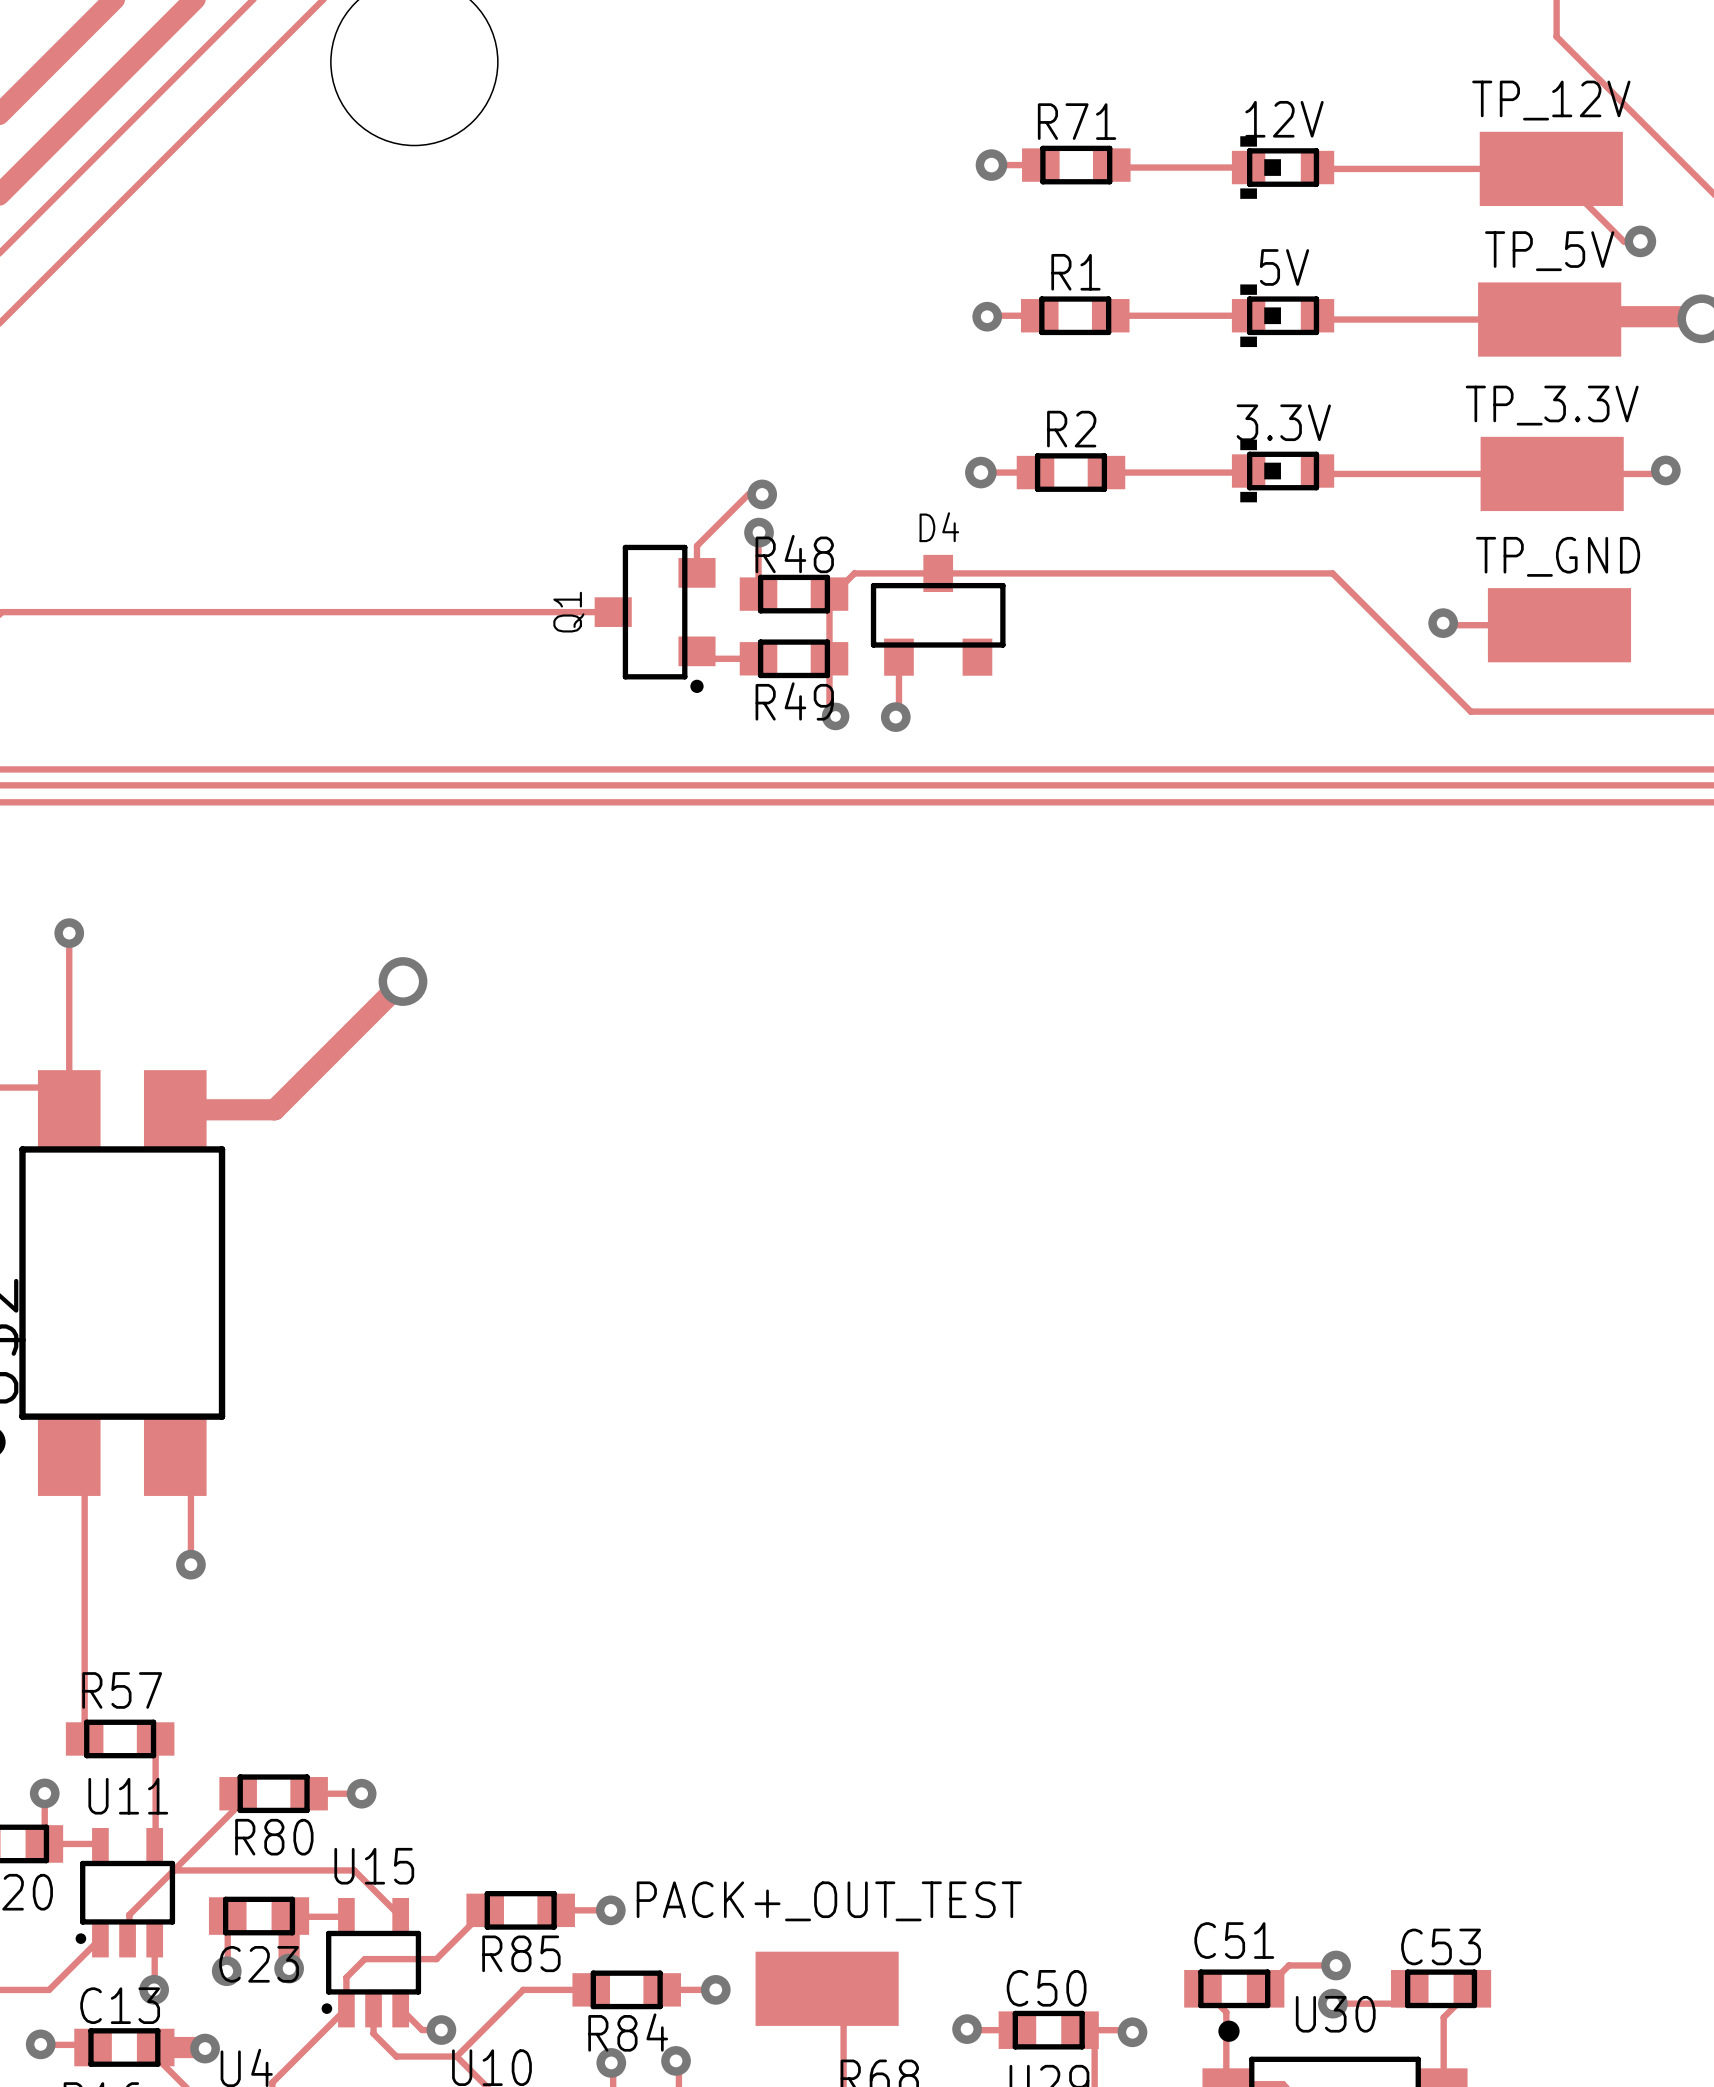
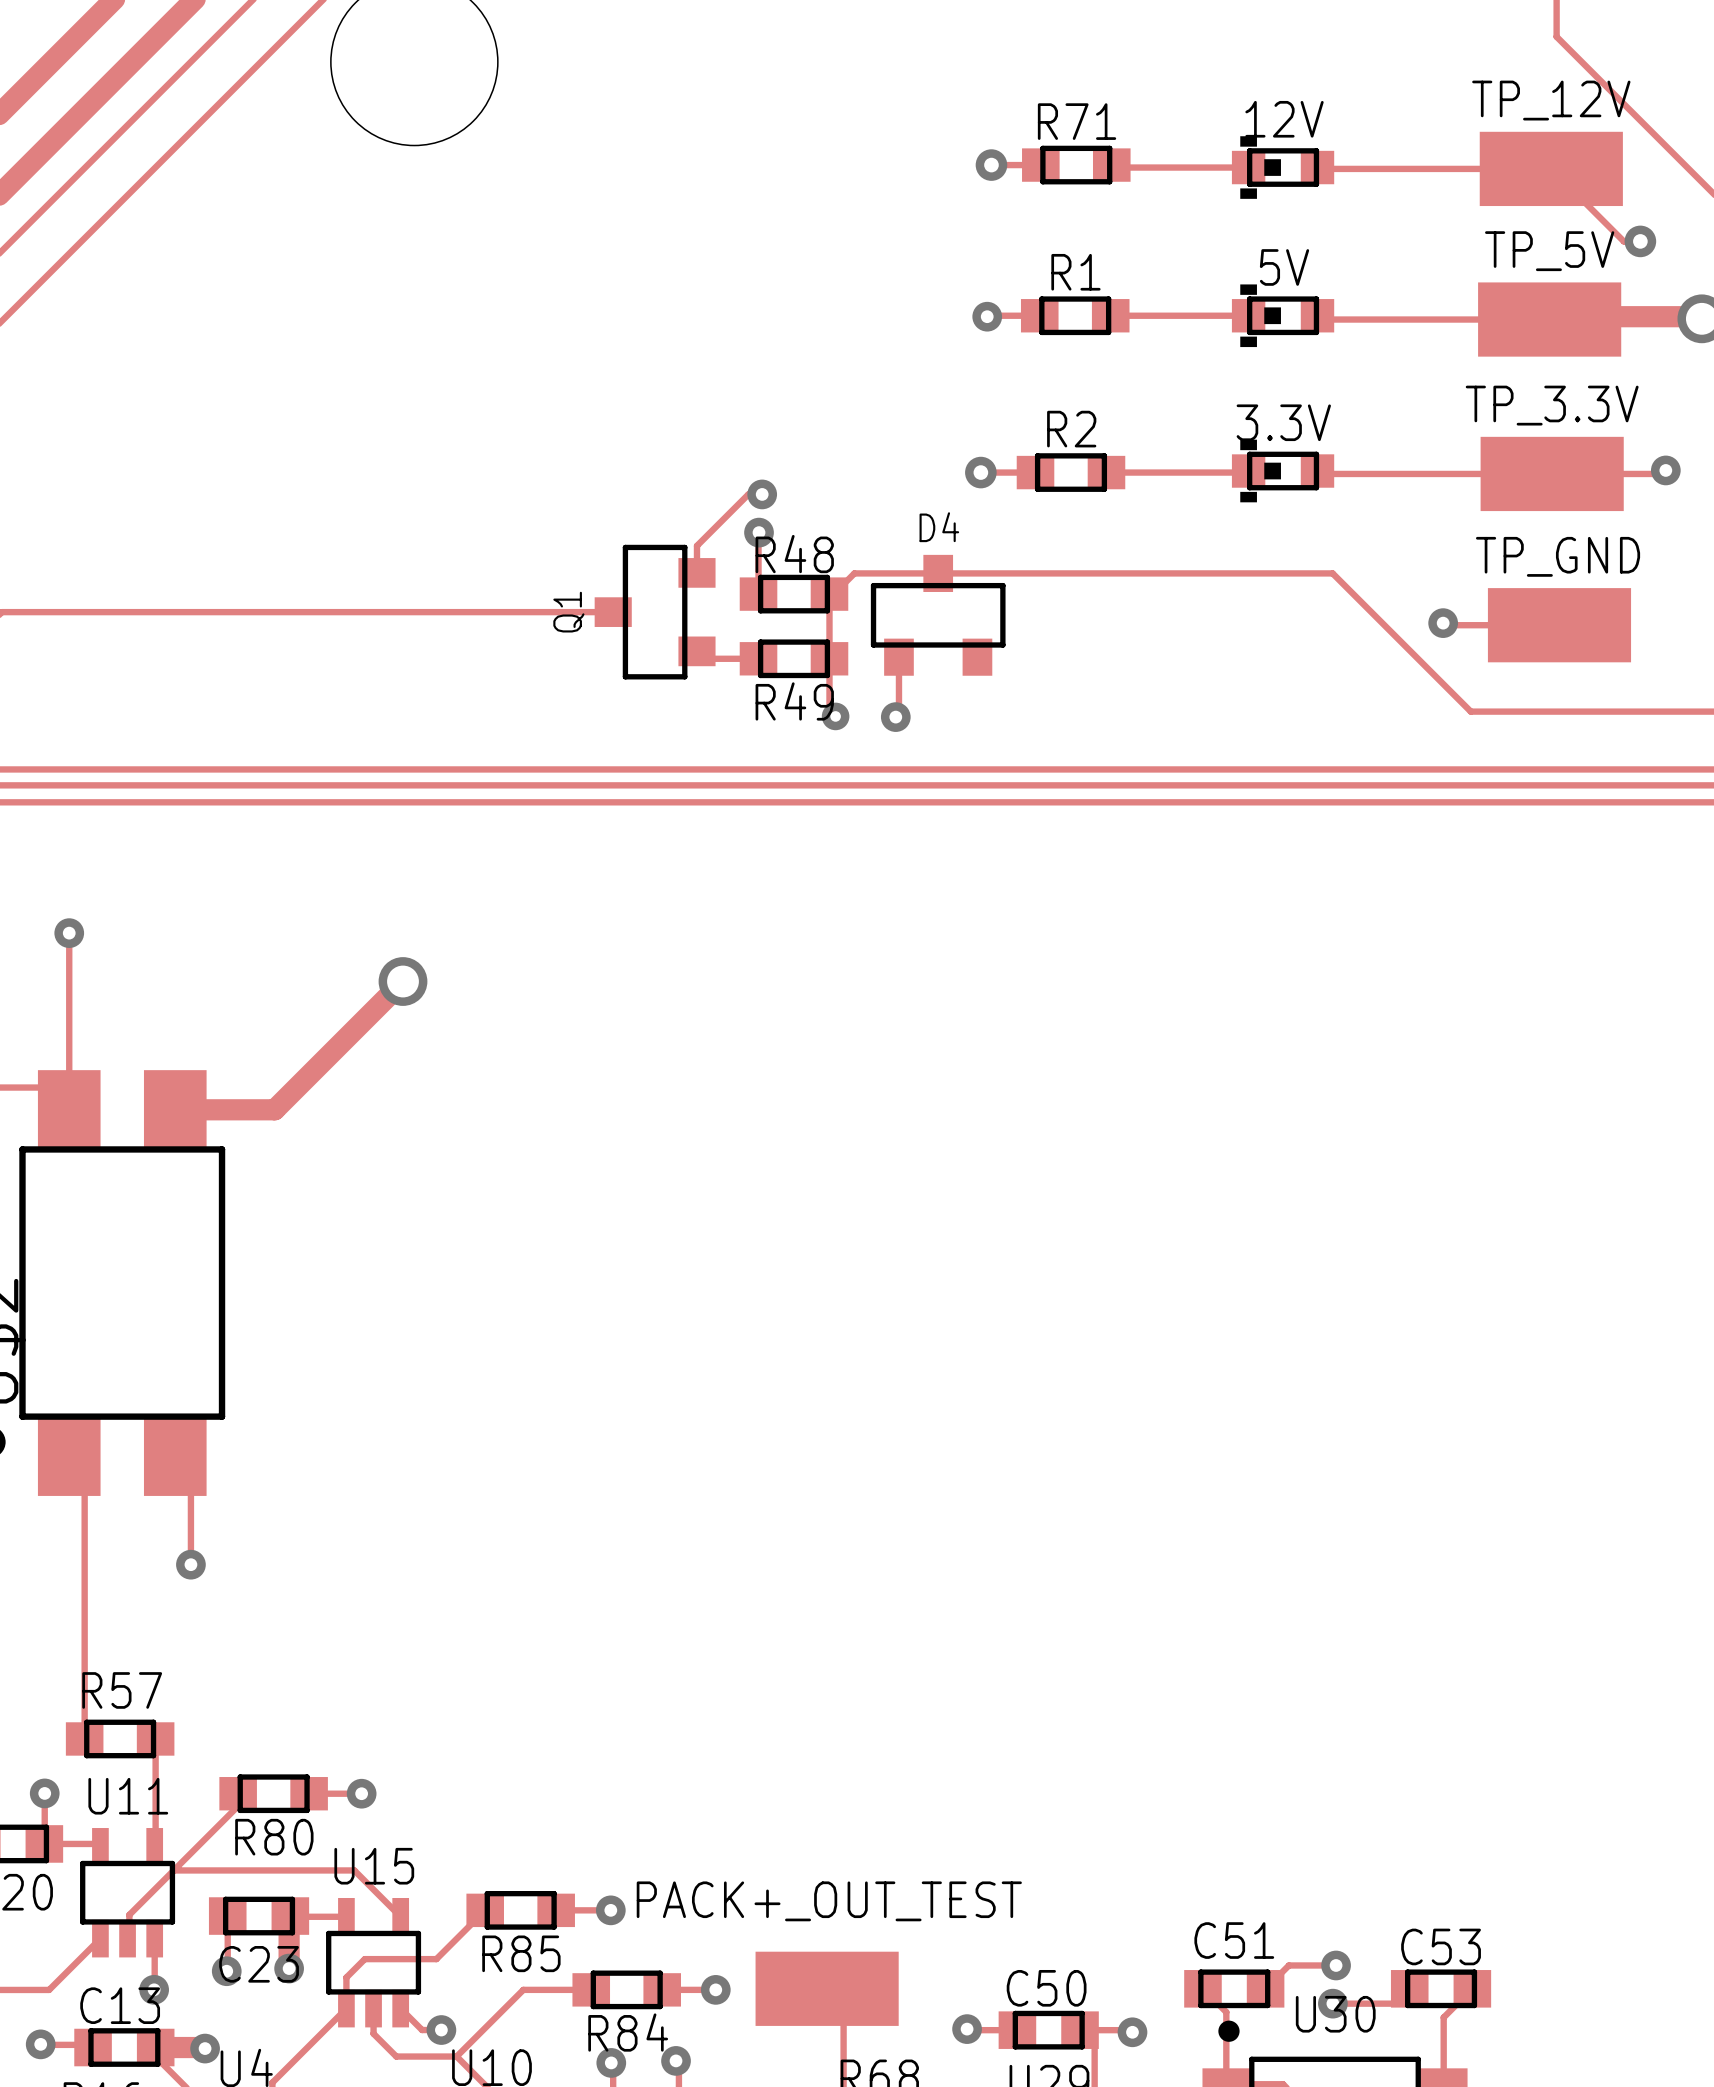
Q1 footprint: [594, 544, 716, 693] -> [594, 544, 716, 680]
U11 footprint: [75, 1828, 176, 1958] -> [80, 1828, 176, 1958]
U15 footprint: [321, 1897, 422, 2028] -> [326, 1897, 422, 2028]

